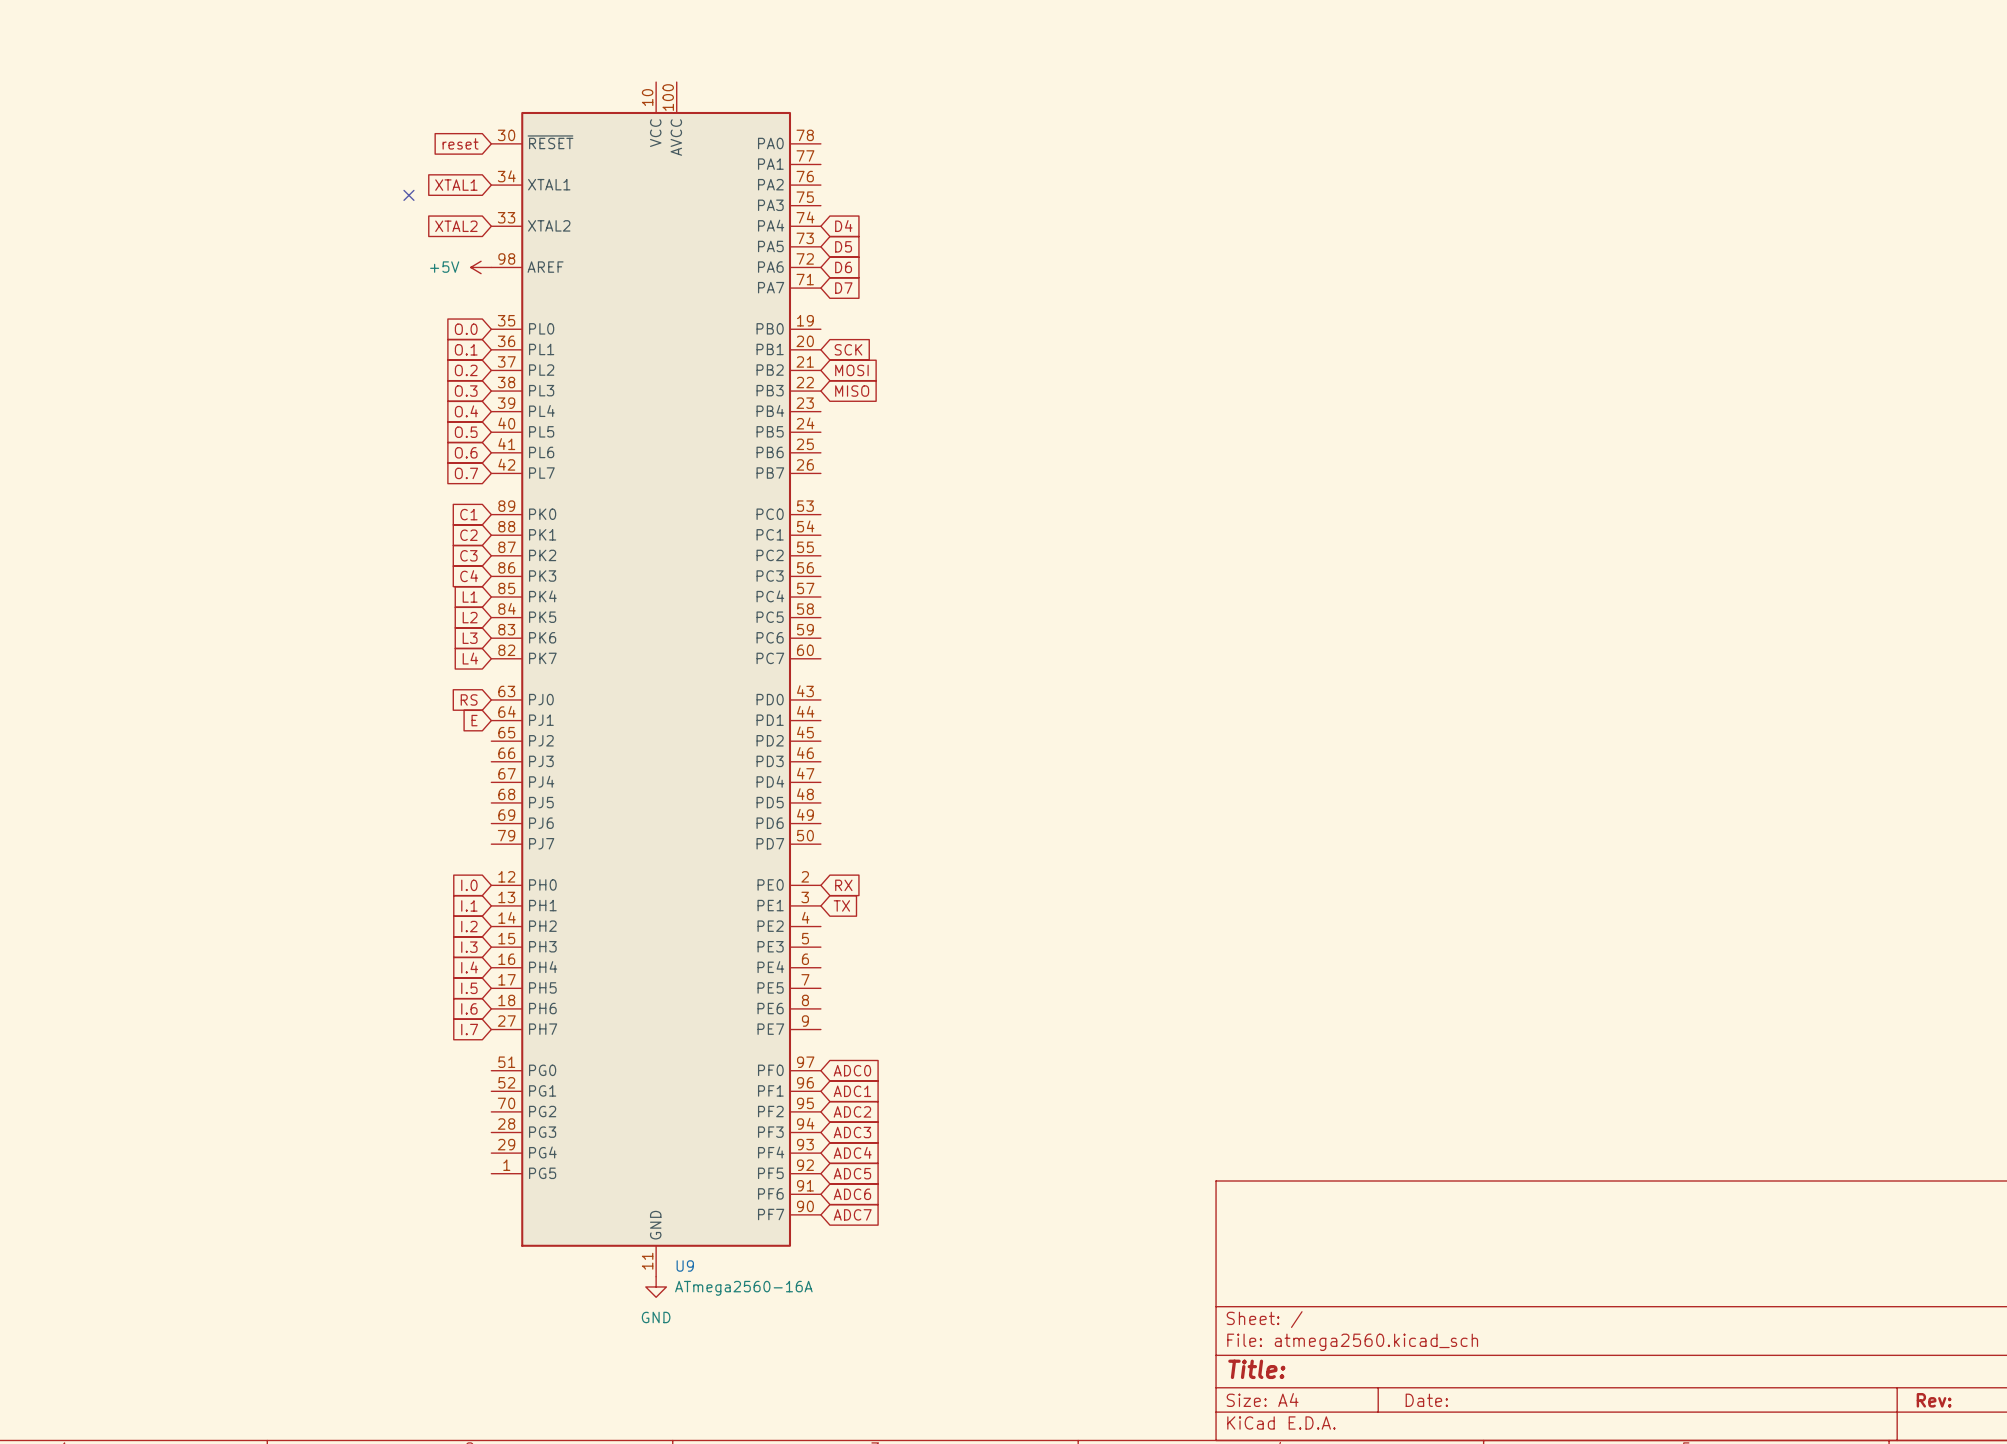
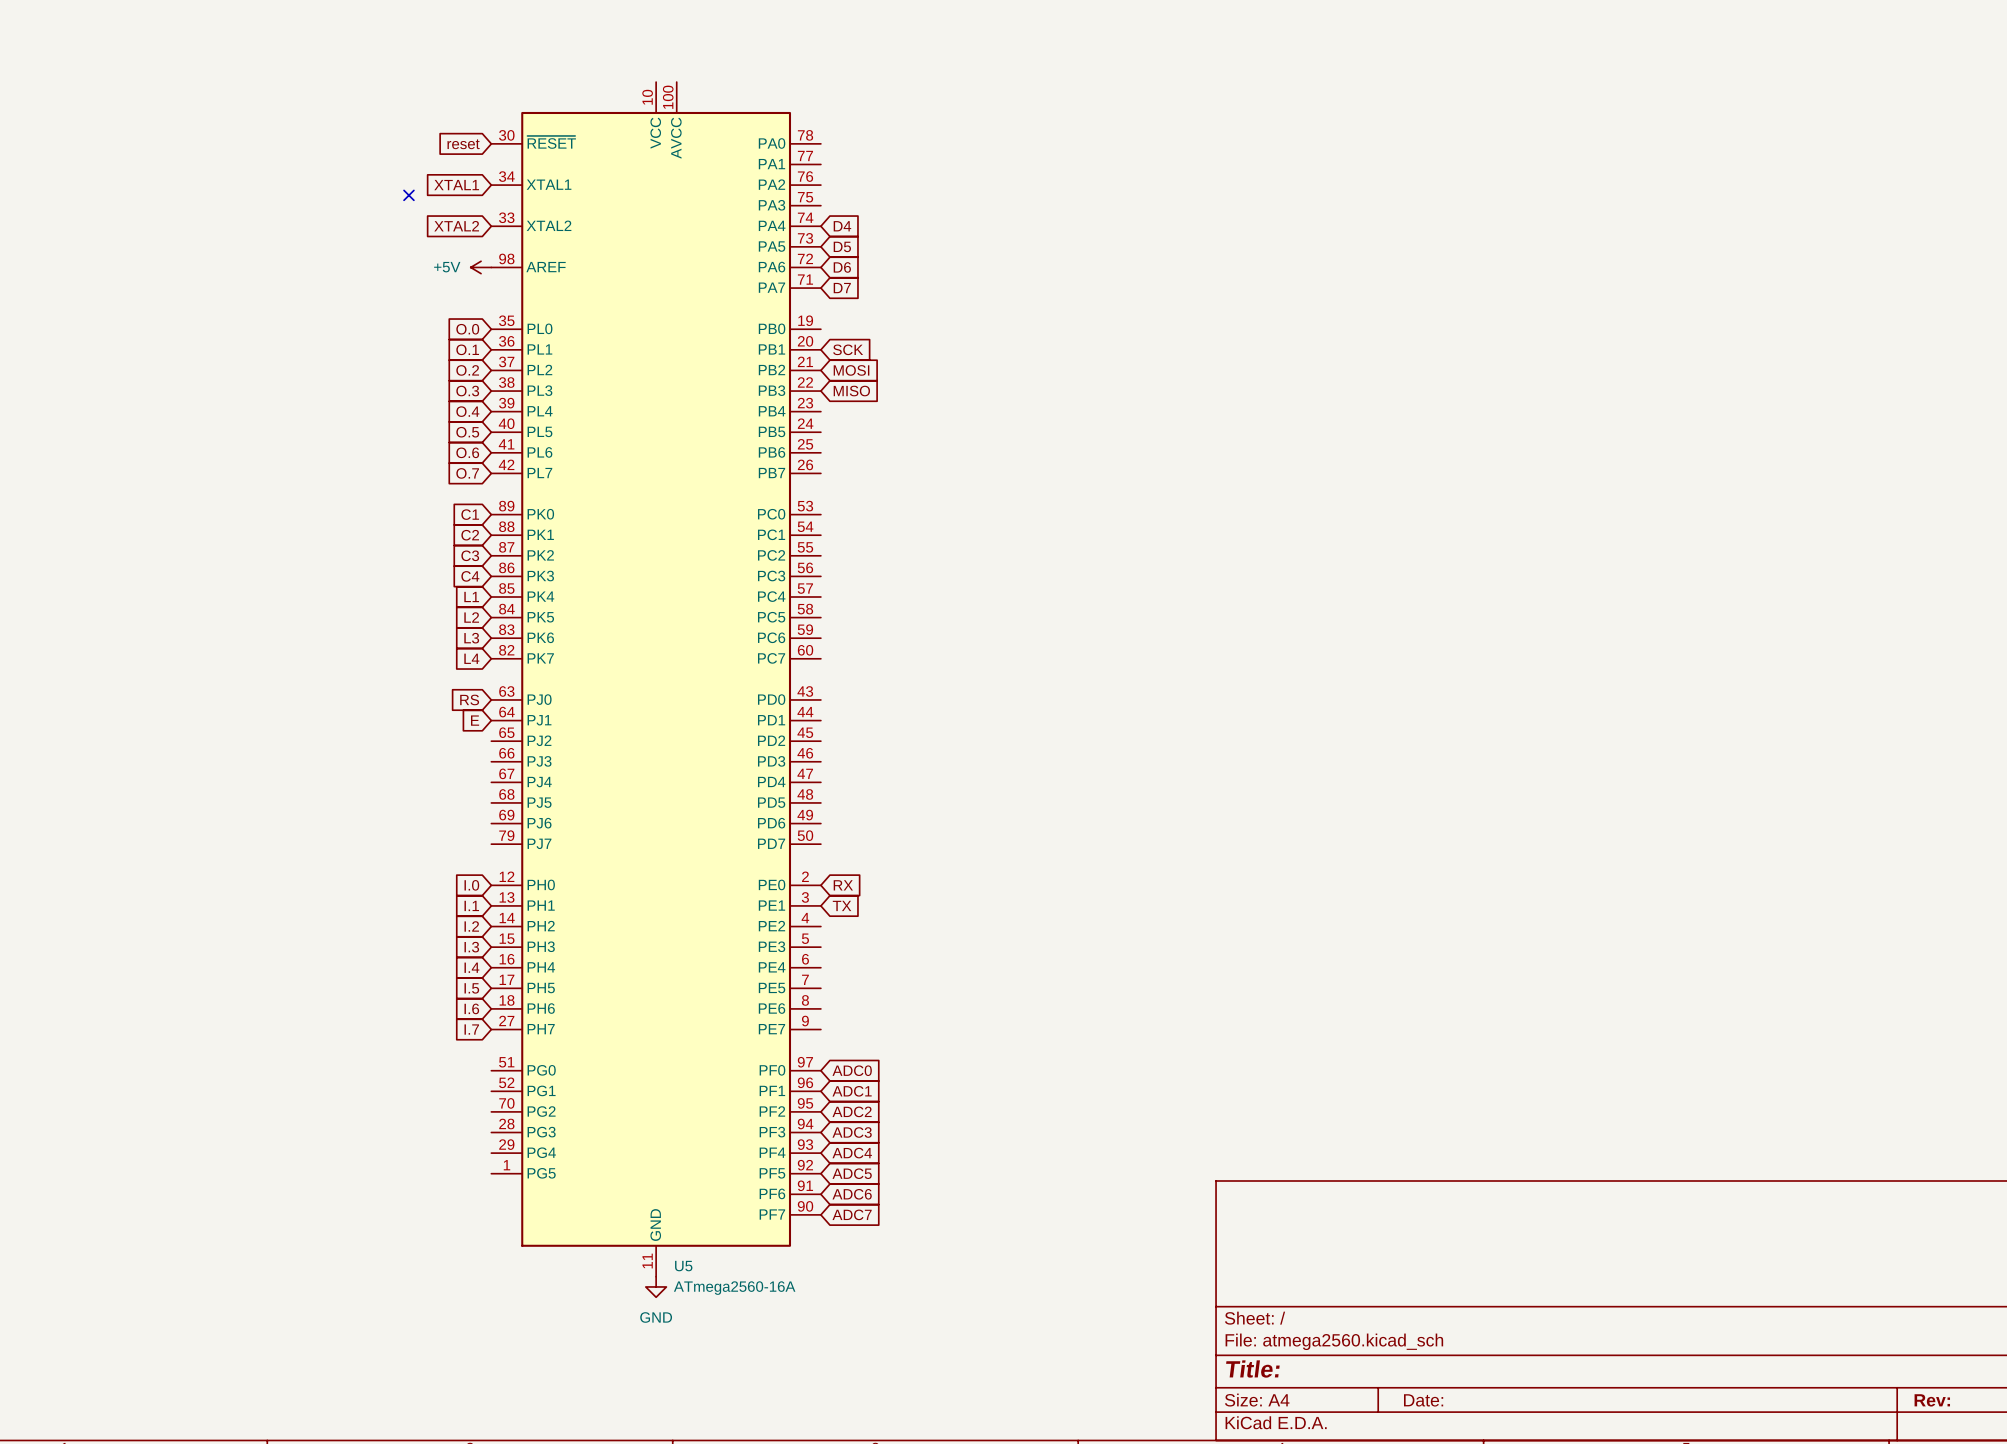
U9 name: U9 (685, 1266) -> U5 (683, 1266)

